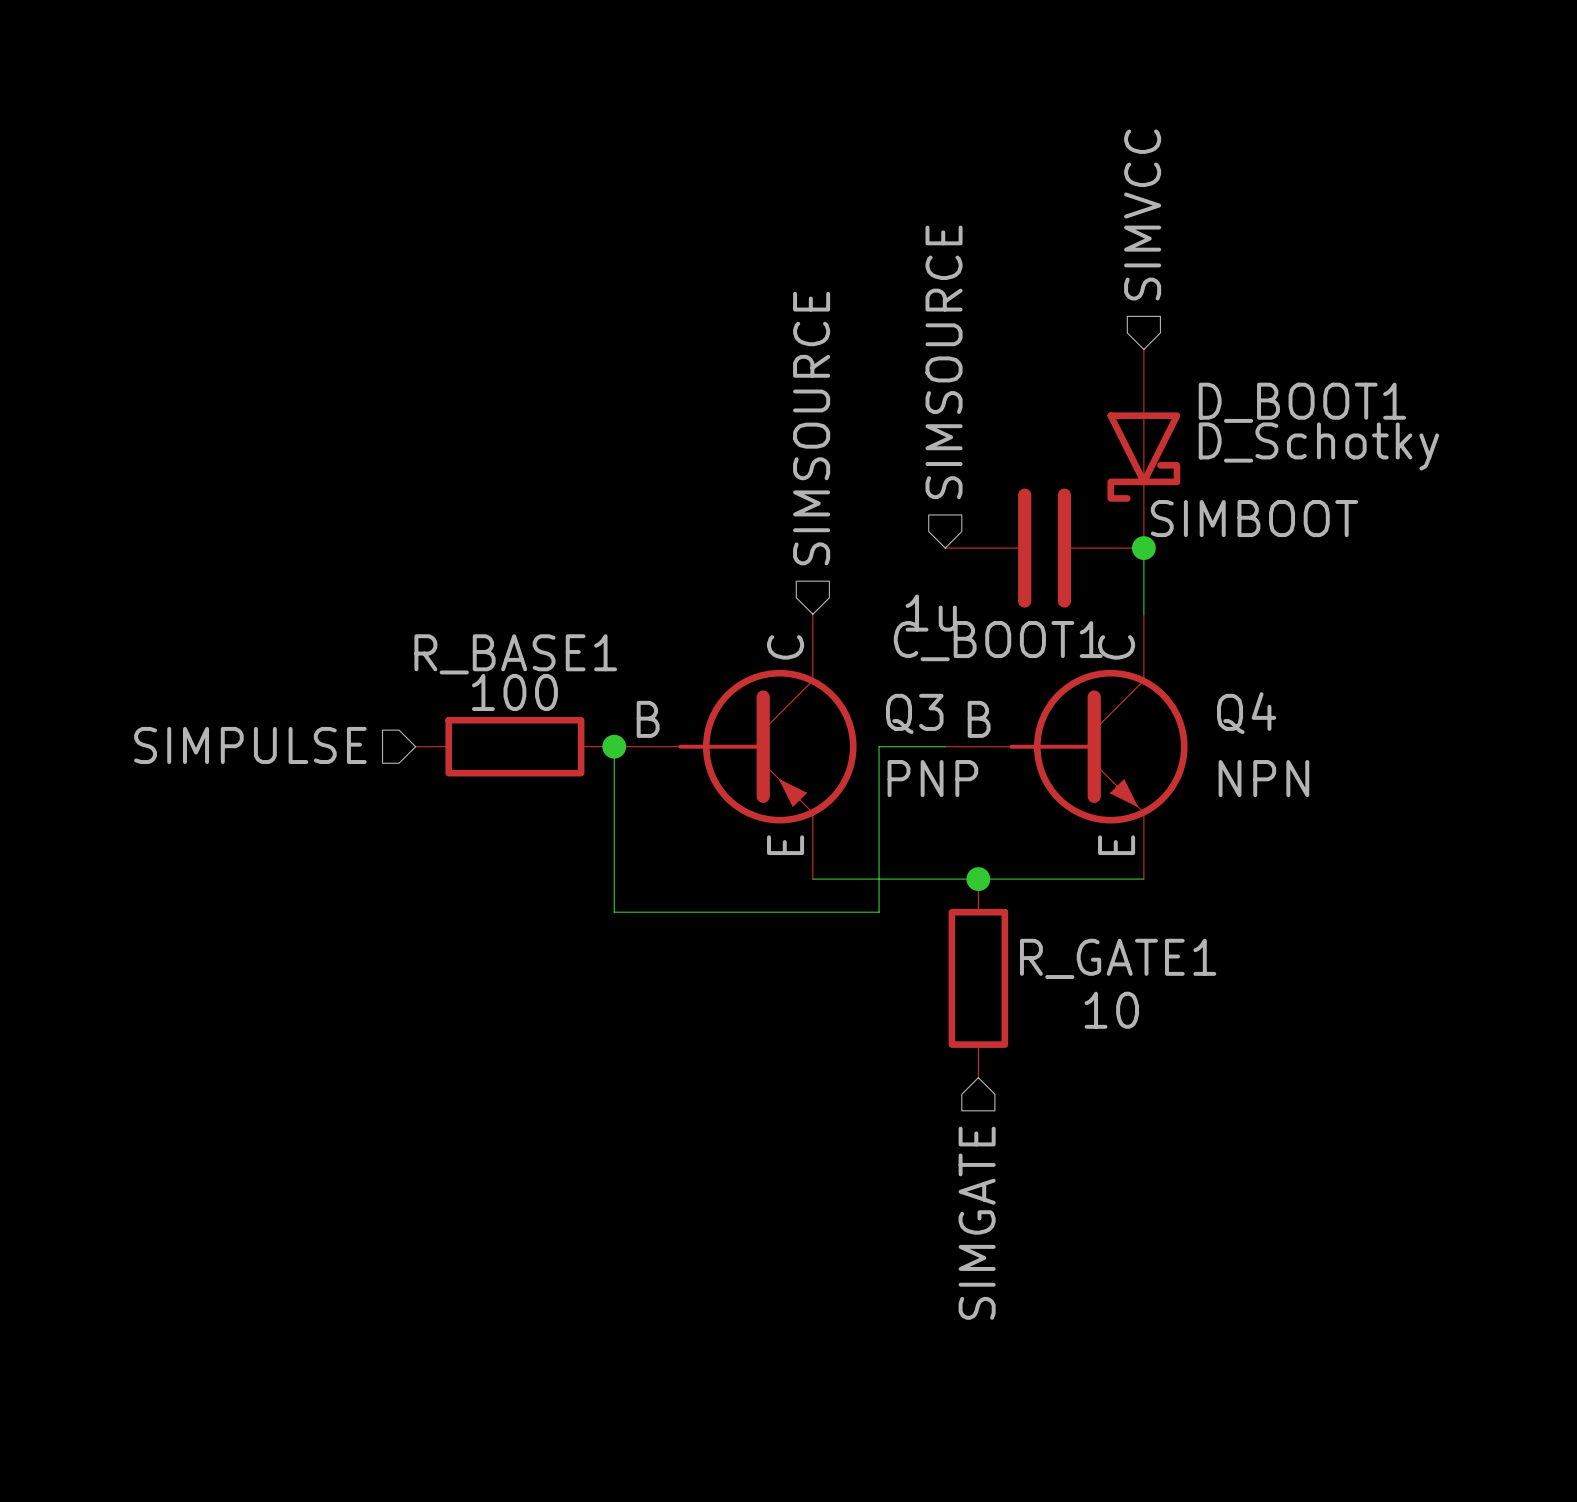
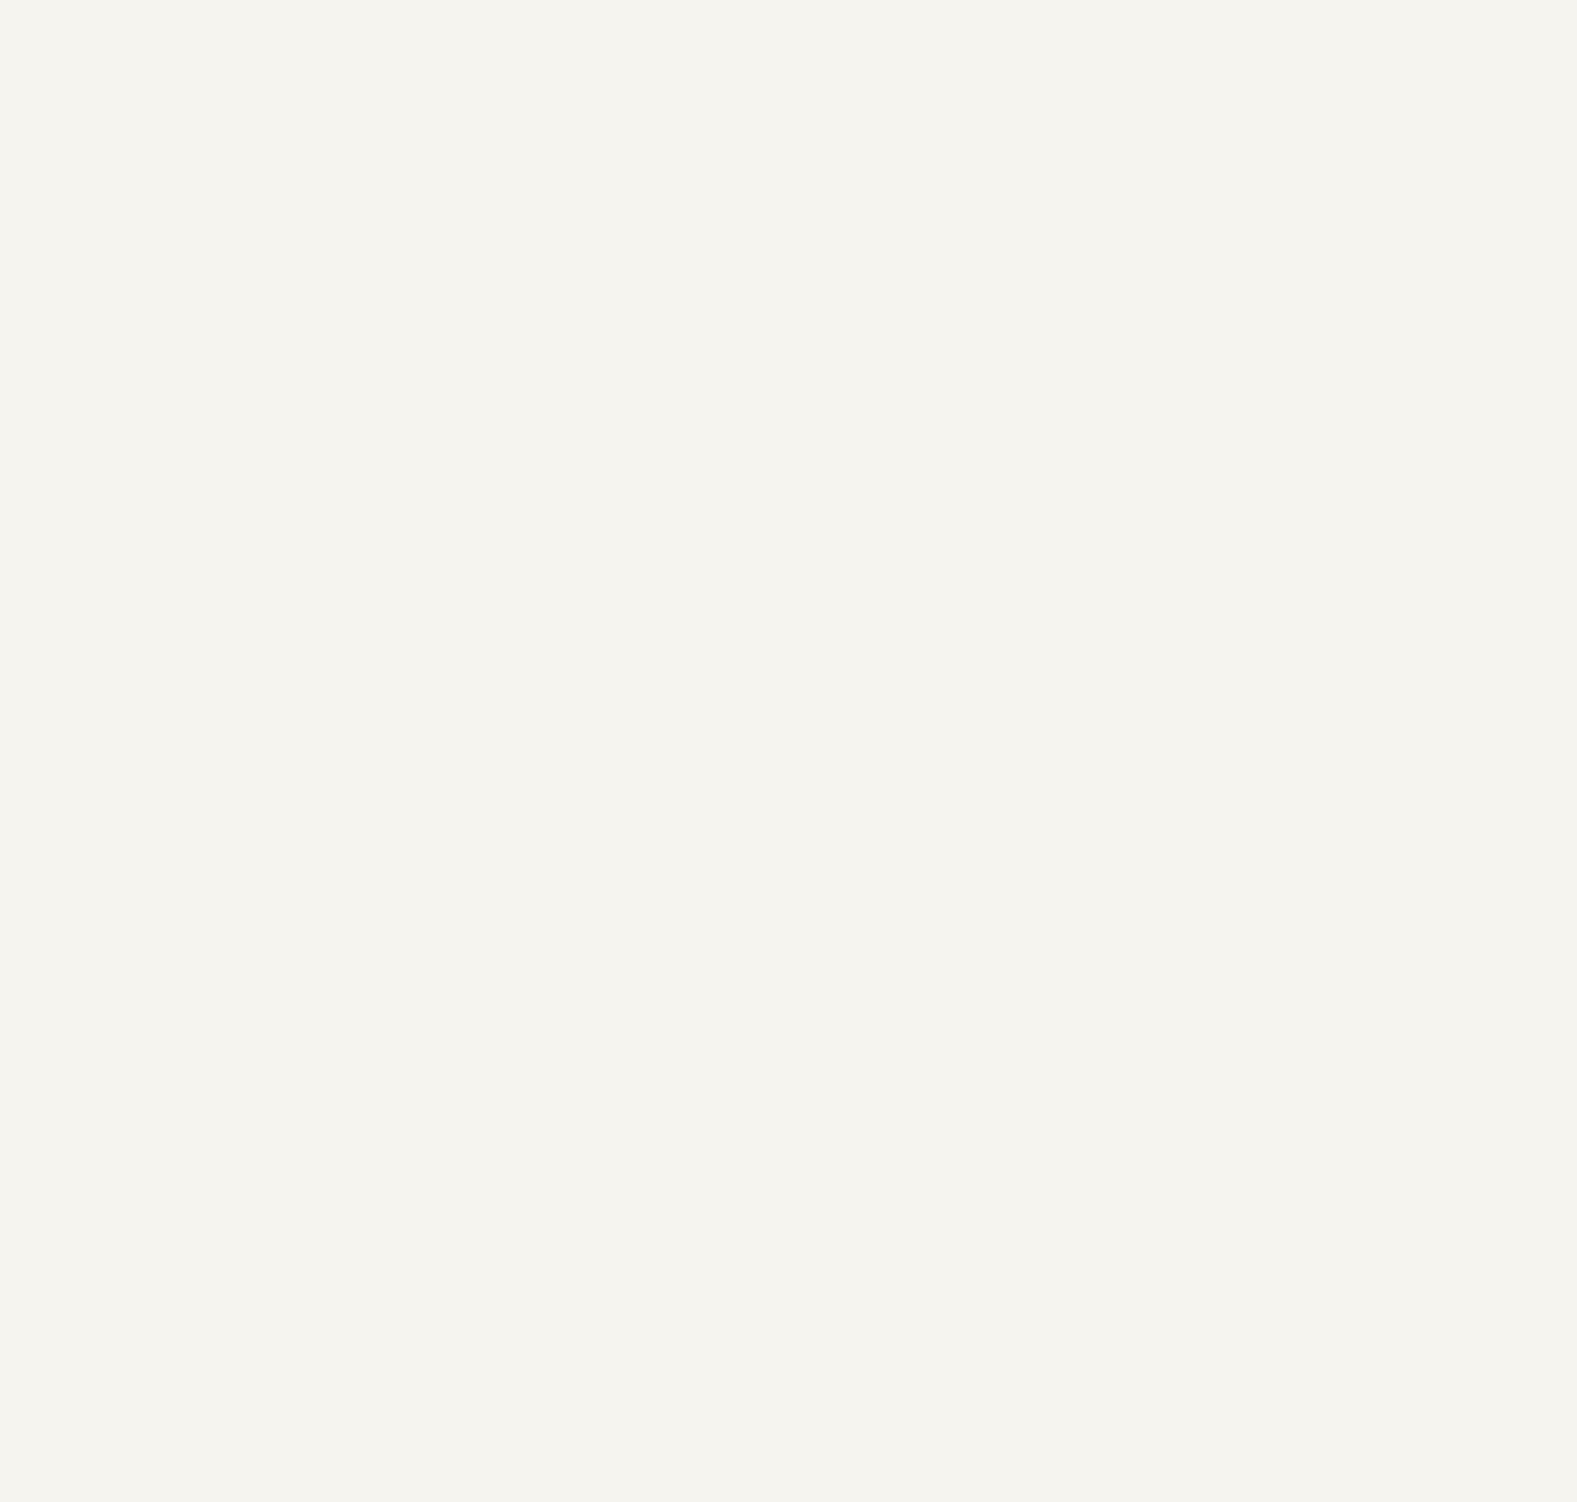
hierarchical label: SIMVCC (1142, 214) -> none
hierarchical label: SIMSOURCE (944, 362) -> none
hierarchical label: SIMSOURCE (811, 428) -> none
D_BOOT1: D_Schotky (1143, 448) -> none
label: SIMBOOT (1254, 518) -> none
C_BOOT1: 1u (1044, 548) -> none
wire: (1143, 548) (1143, 614) -> none
junction: (1143, 548) -> none
hierarchical label: SIMPULSE (250, 745) -> none
R_BASE1: 100 (514, 746) -> none
wire: (614, 746) (614, 912) (879, 912) (879, 746) (945, 746) -> none
junction: (614, 746) -> none
Q3: PNP (735, 746) -> none
Q4: NPN (1066, 746) -> none
wire: (812, 879) (1143, 879) -> none
junction: (978, 879) -> none
R_GATE1: 10 (978, 978) -> none
hierarchical label: SIMGATE (977, 1223) -> none

